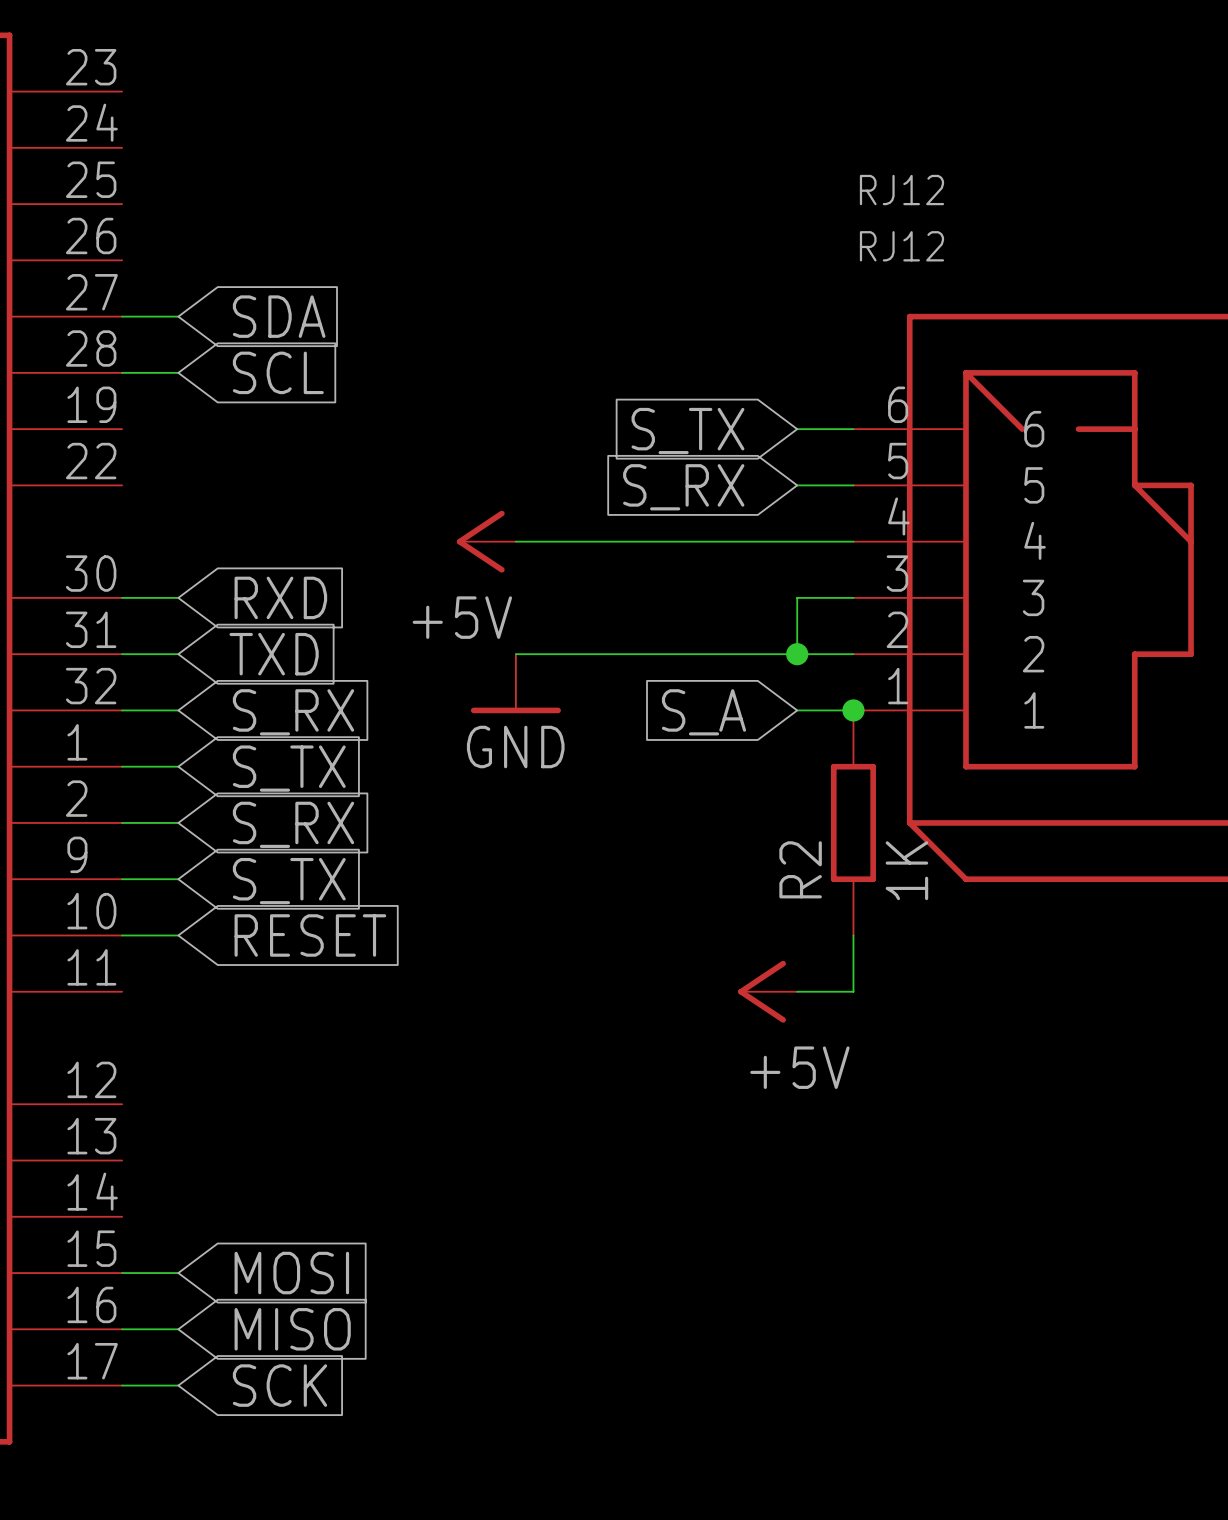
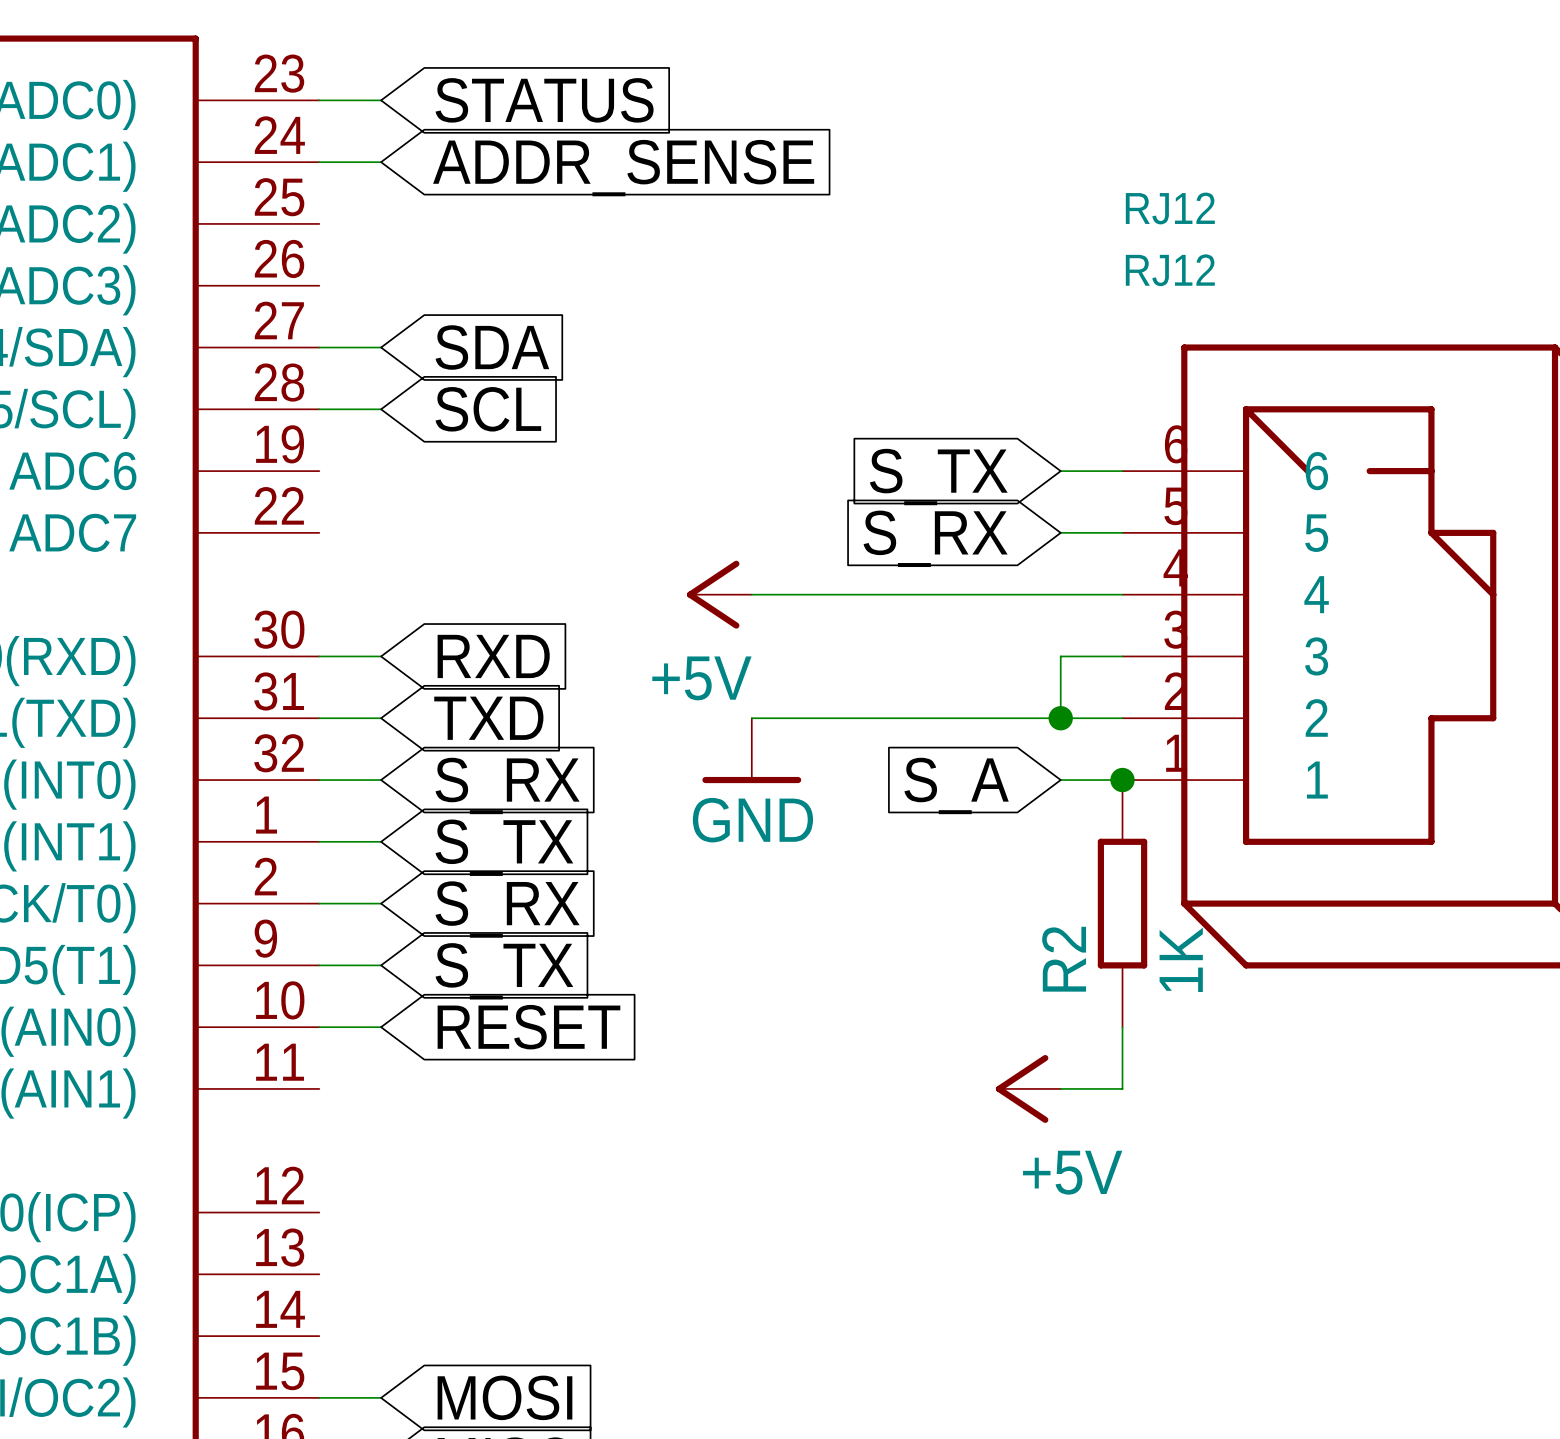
wire: none -> (319, 100) (381, 100)
global label: none -> STATUS (544, 100)
wire: none -> (319, 162) (381, 162)
global label: none -> ADDR_SENSE (623, 168)

